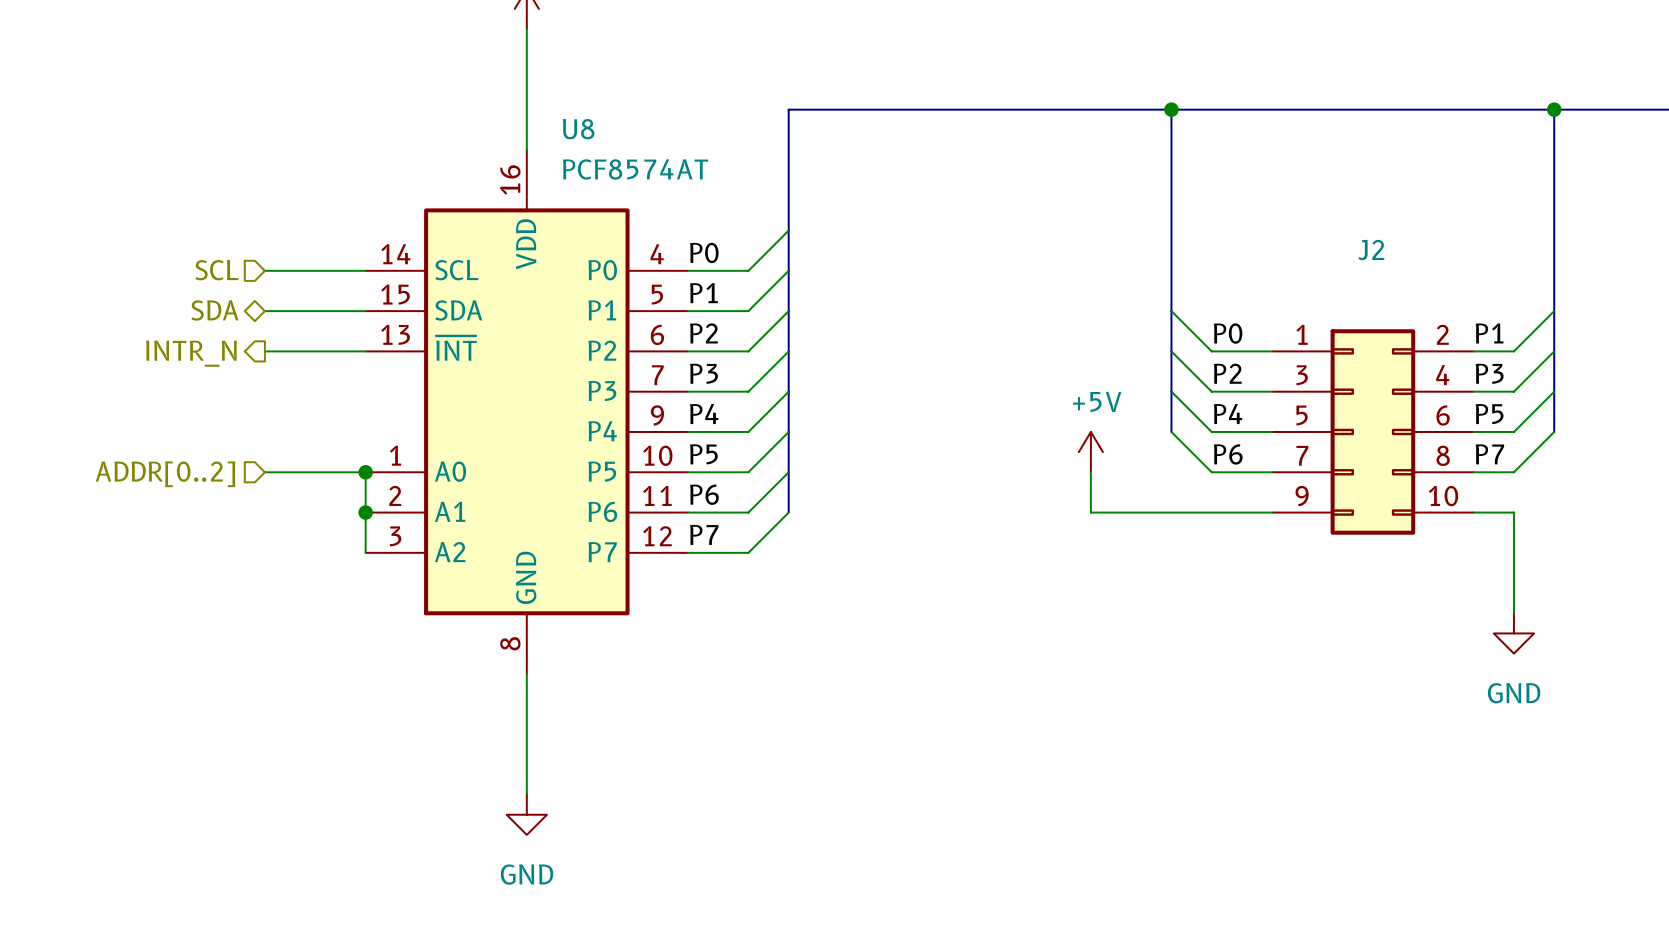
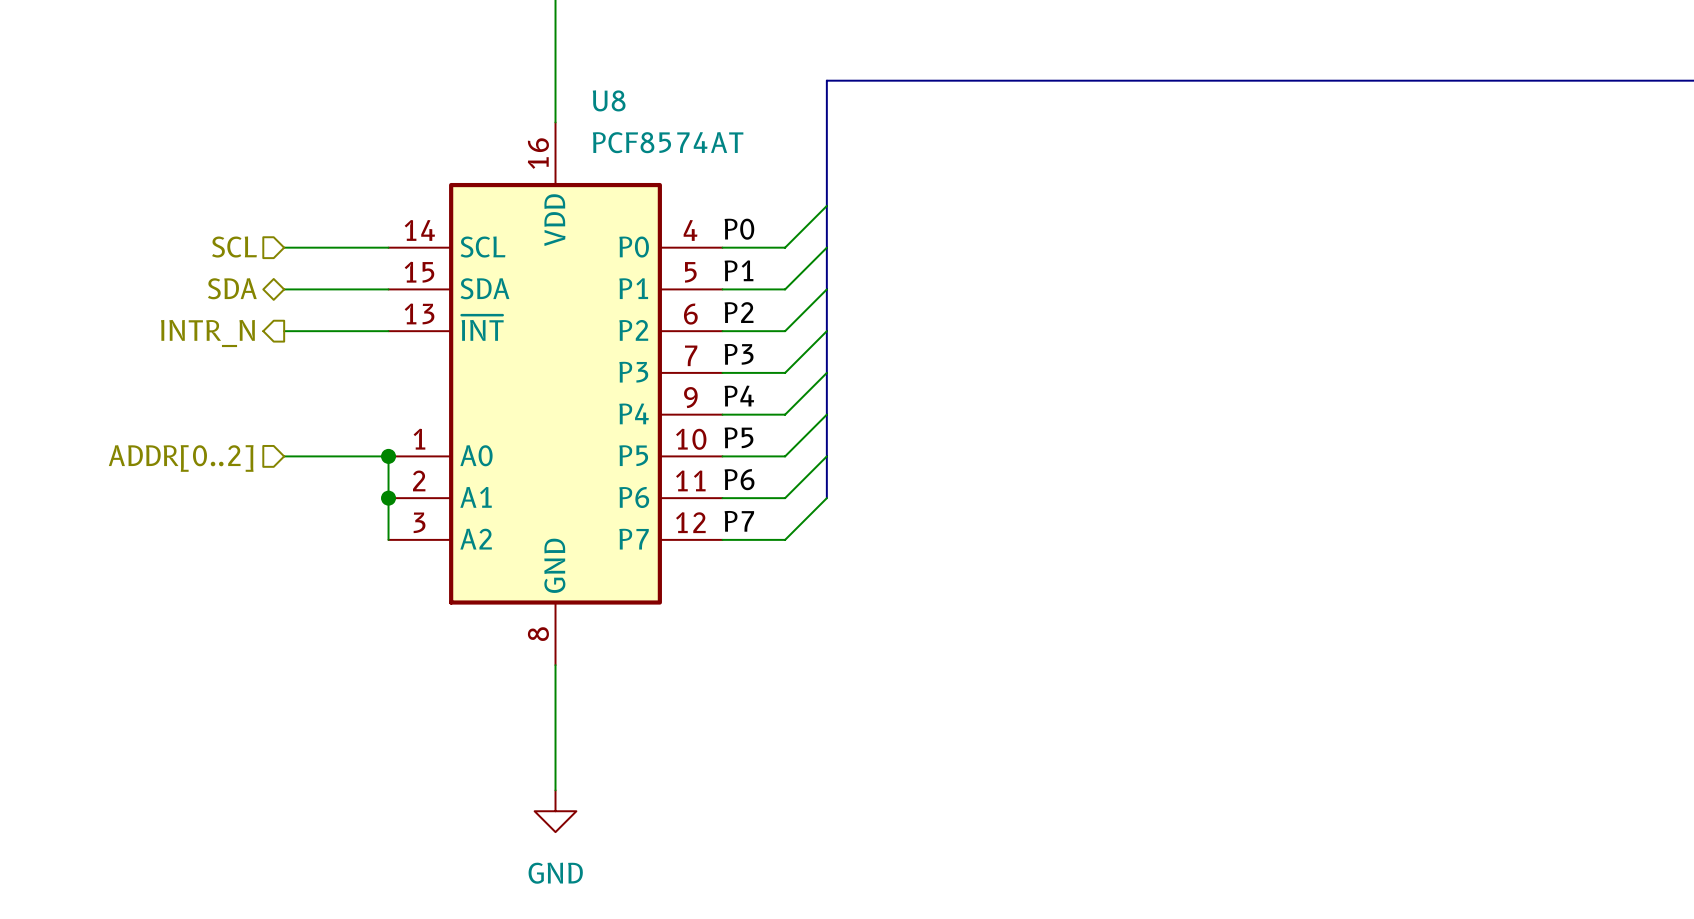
bus: (1171, 109) (1171, 431) -> none
junction: (1171, 109) -> none
bus: (1554, 109) (1554, 431) -> none
junction: (1554, 109) -> none
wire: (1171, 311) (1211, 351) (1272, 351) -> none
wire: (1554, 311) (1513, 351) (1473, 351) -> none
label: P0 (1228, 333) -> none
label: P1 (1489, 333) -> none
wire: (1171, 351) (1211, 391) (1272, 391) -> none
wire: (1554, 351) (1513, 391) (1473, 391) -> none
label: P2 (1227, 373) -> none
label: P3 (1489, 373) -> none
wire: (1171, 391) (1211, 431) (1272, 431) -> none
wire: (1554, 391) (1513, 431) (1473, 431) -> none
label: P4 (1228, 414) -> none
label: P5 (1489, 414) -> none
wire: (1171, 431) (1211, 472) (1272, 472) -> none
J2: (1372, 431) -> none
wire: (1554, 431) (1513, 472) (1473, 472) -> none
power symbol: +5V (1090, 452) -> none
label: P6 (1228, 454) -> none
label: P7 (1489, 454) -> none
wire: (1090, 472) (1090, 512) (1272, 512) -> none
wire: (1473, 512) (1513, 512) (1513, 613) -> none
power symbol: GND (1513, 633) -> none

